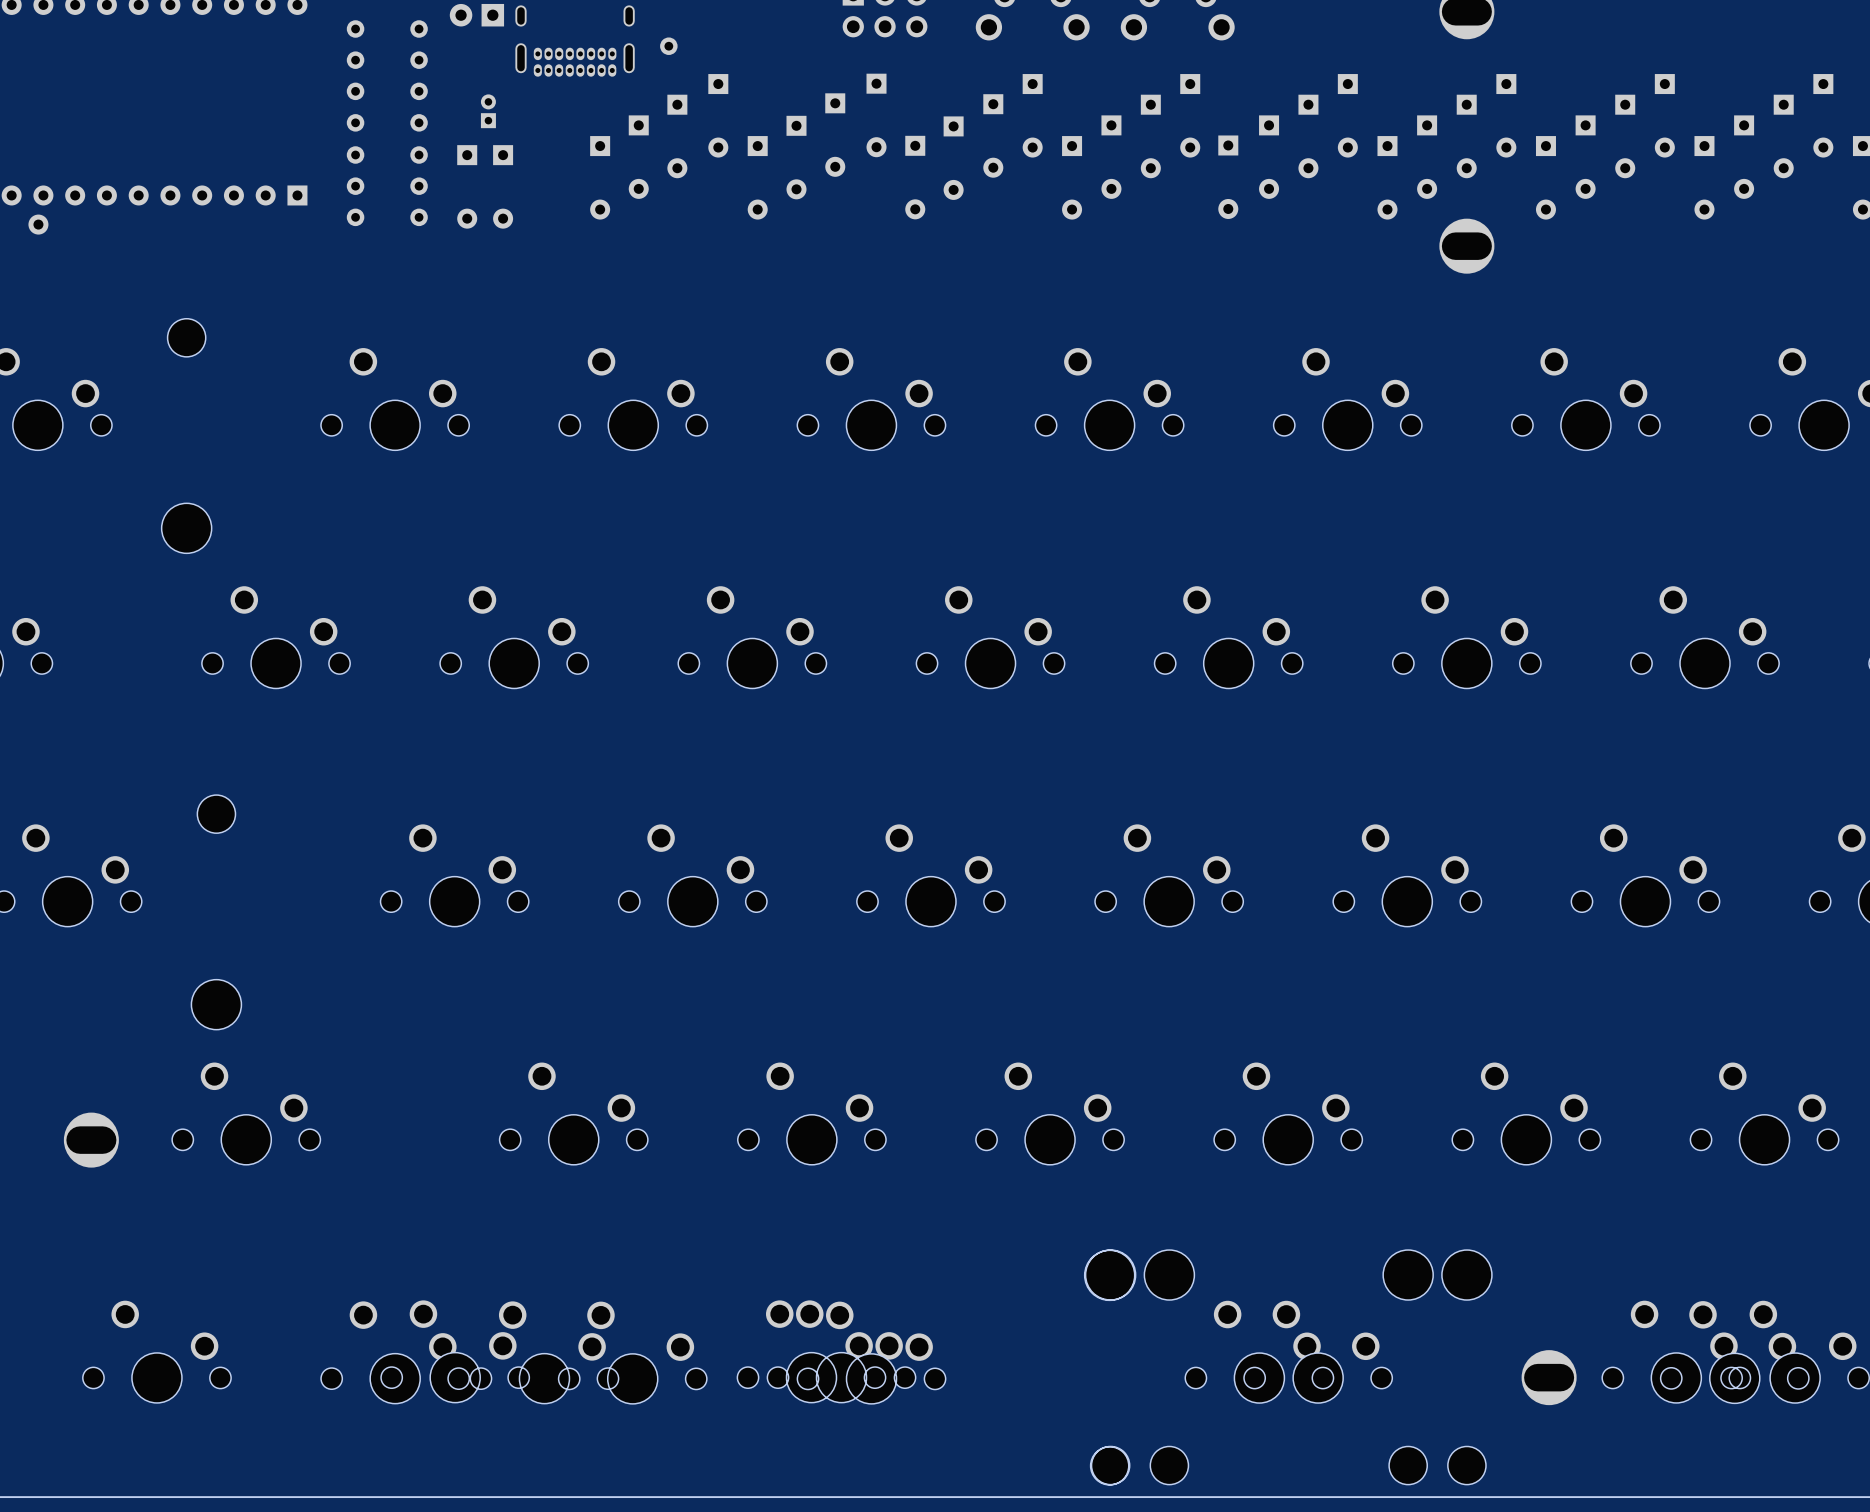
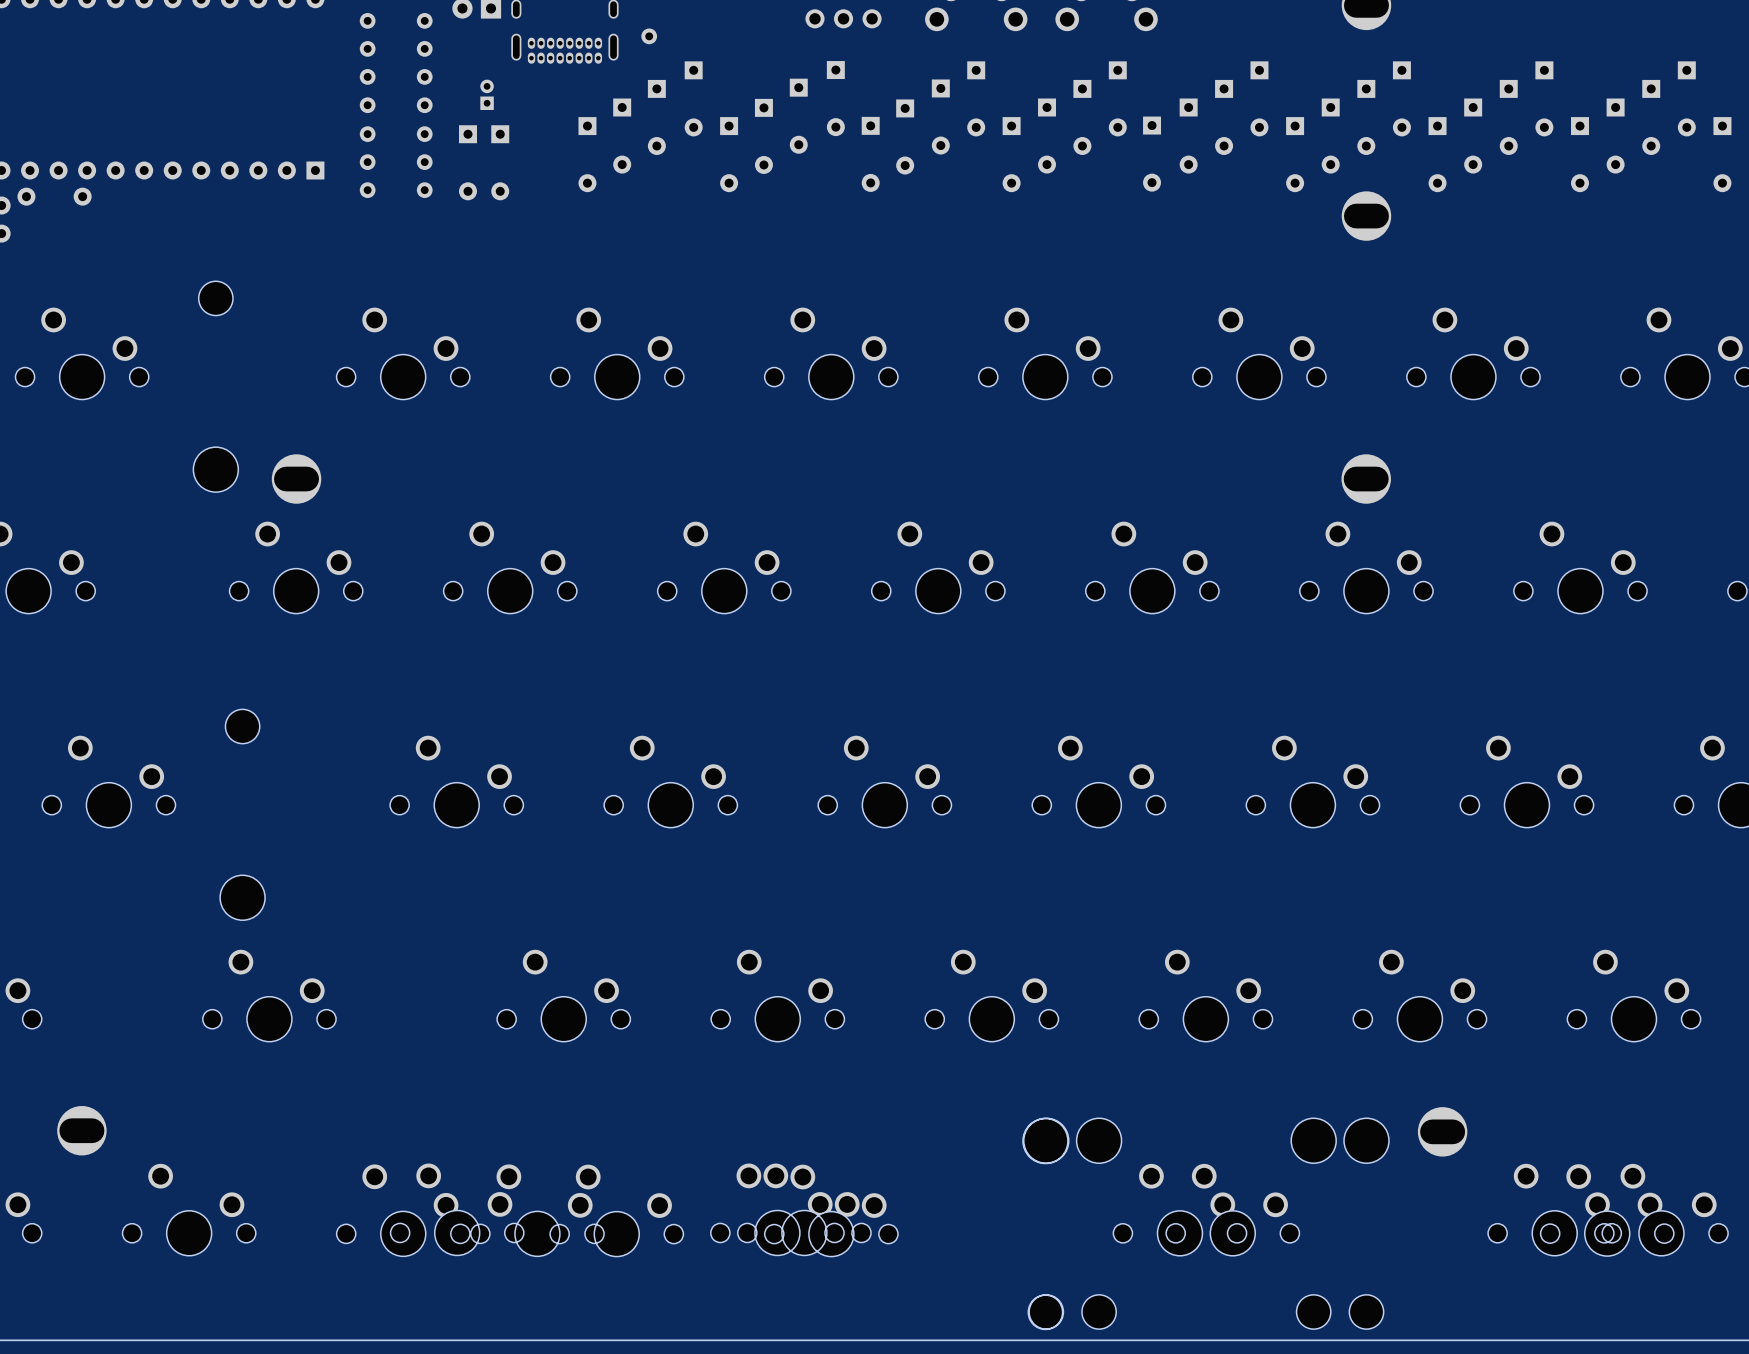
part: none -> (296, 479)
part: none -> (1366, 479)
part position: (91, 1140) -> (81, 1130)
part position: (1549, 1377) -> (1442, 1131)

